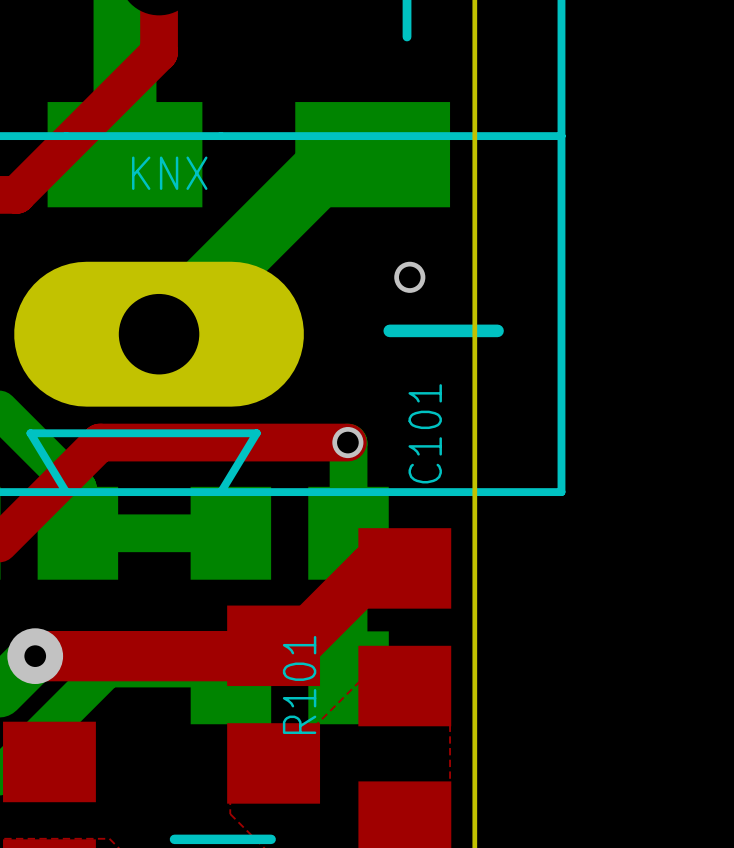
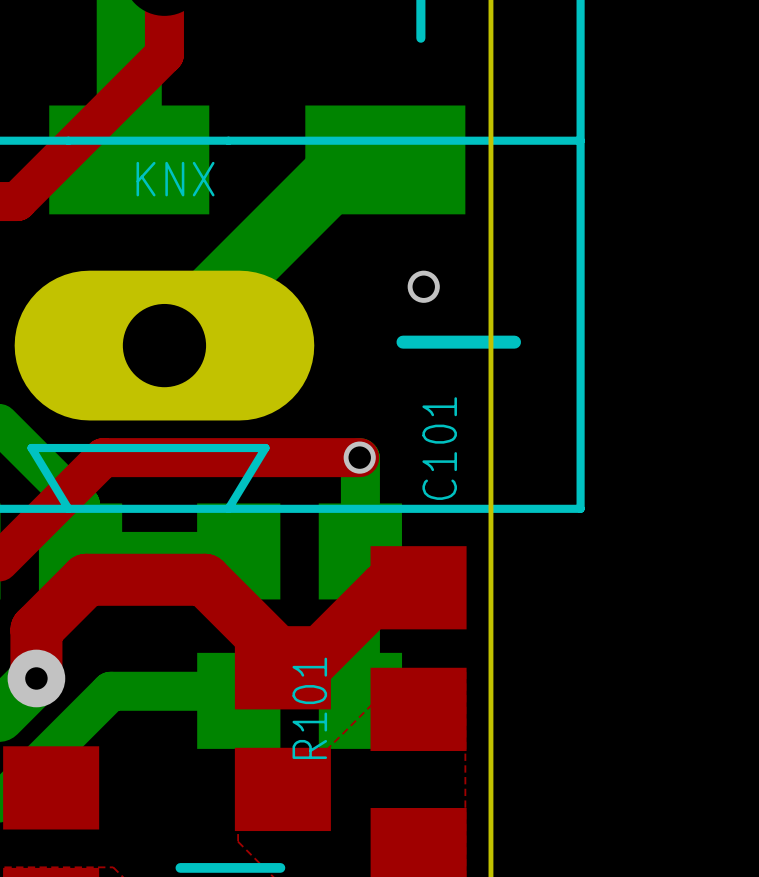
top track: (273, 645) (255, 645) (245, 656) (35, 656) -> (284, 667) (284, 659) (204, 579) (86, 579) (36, 629) (36, 678)

